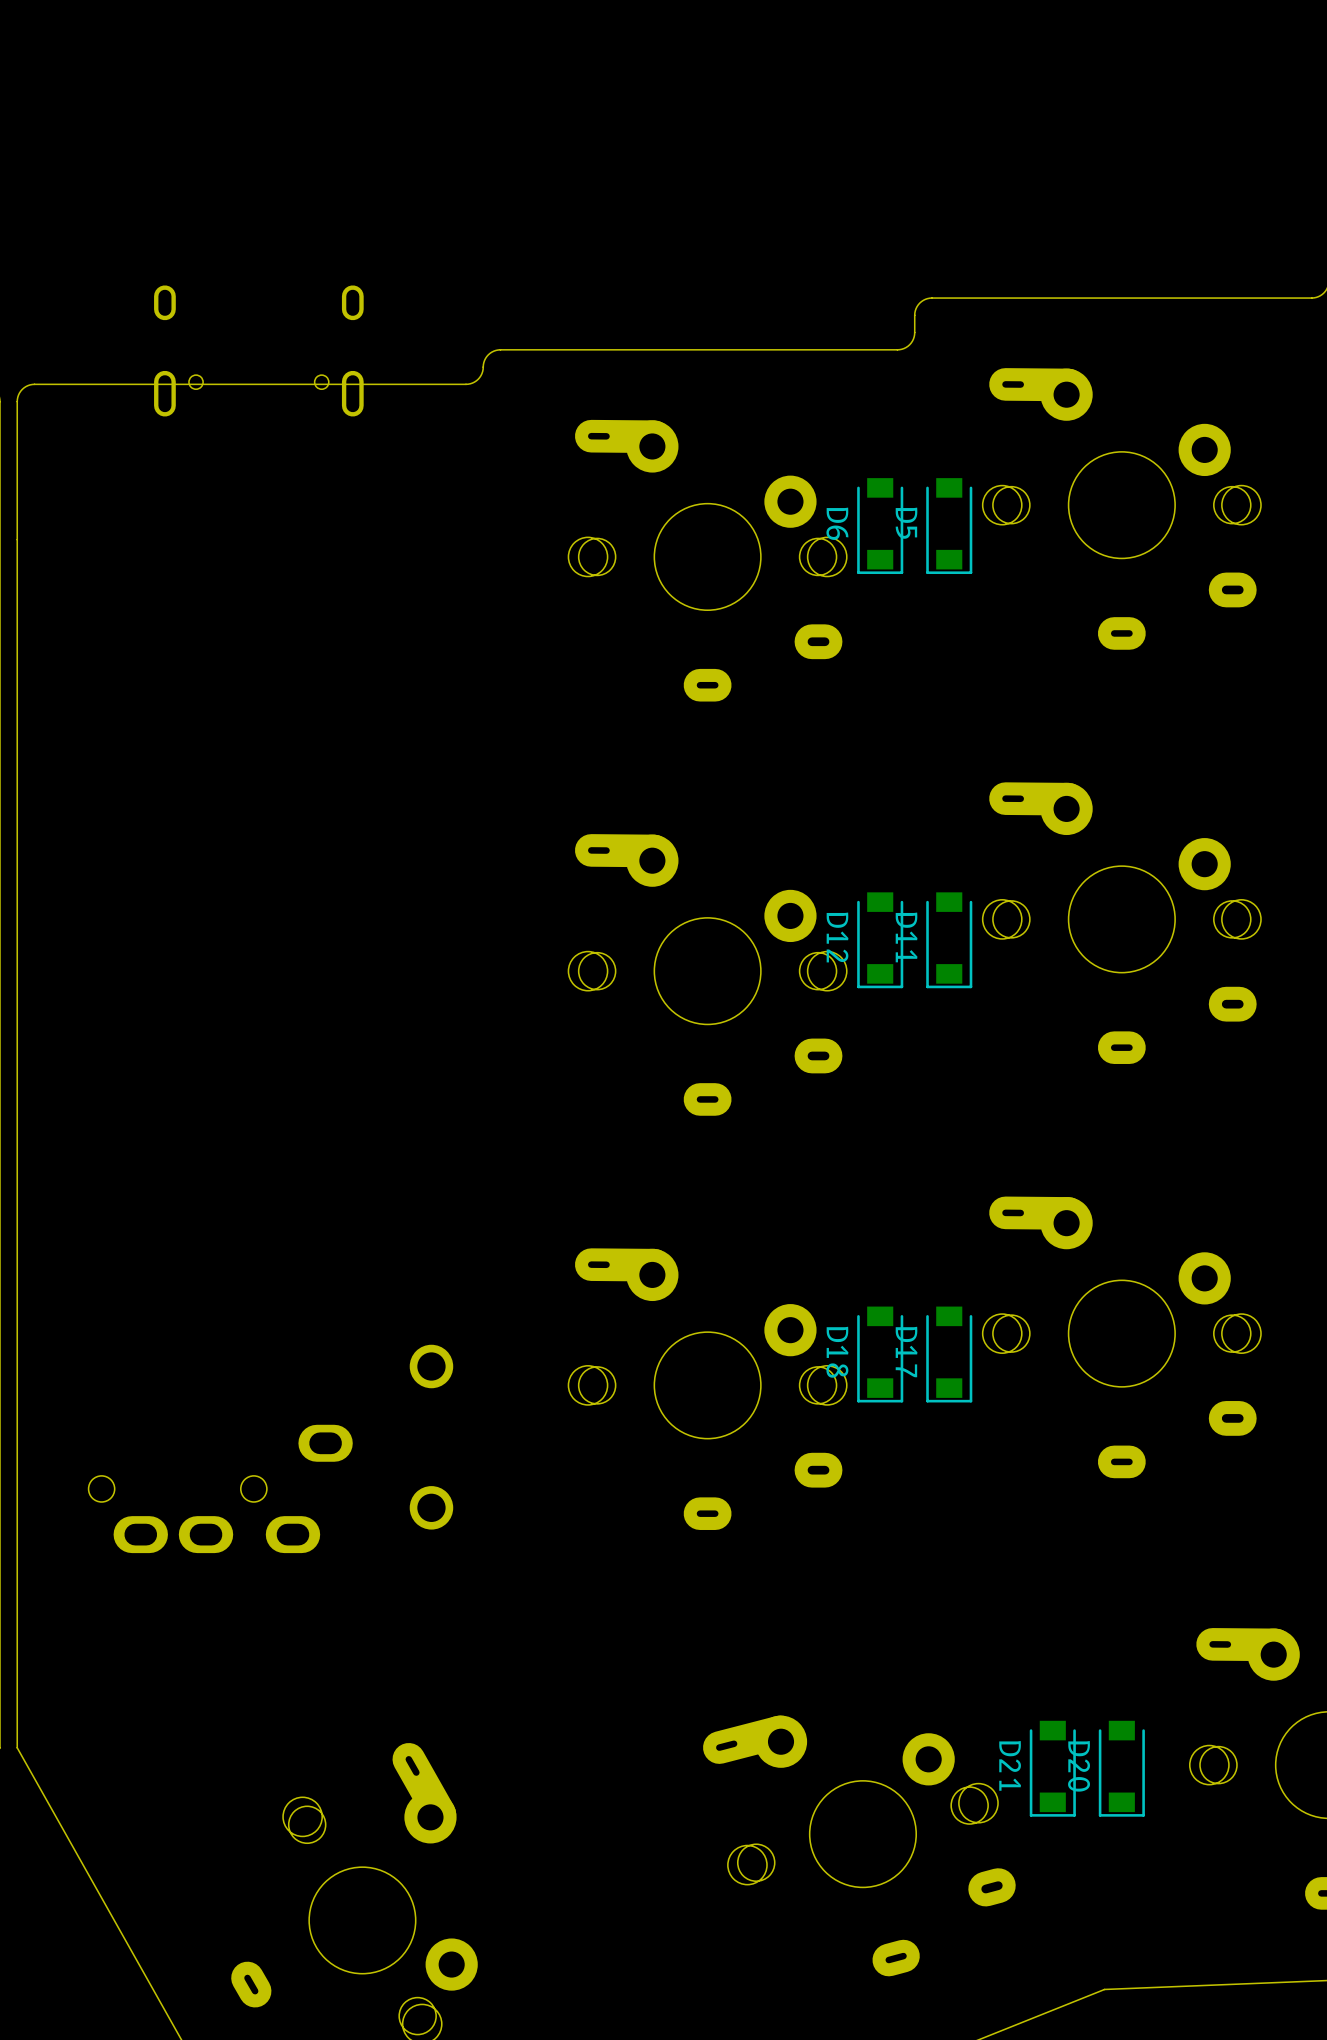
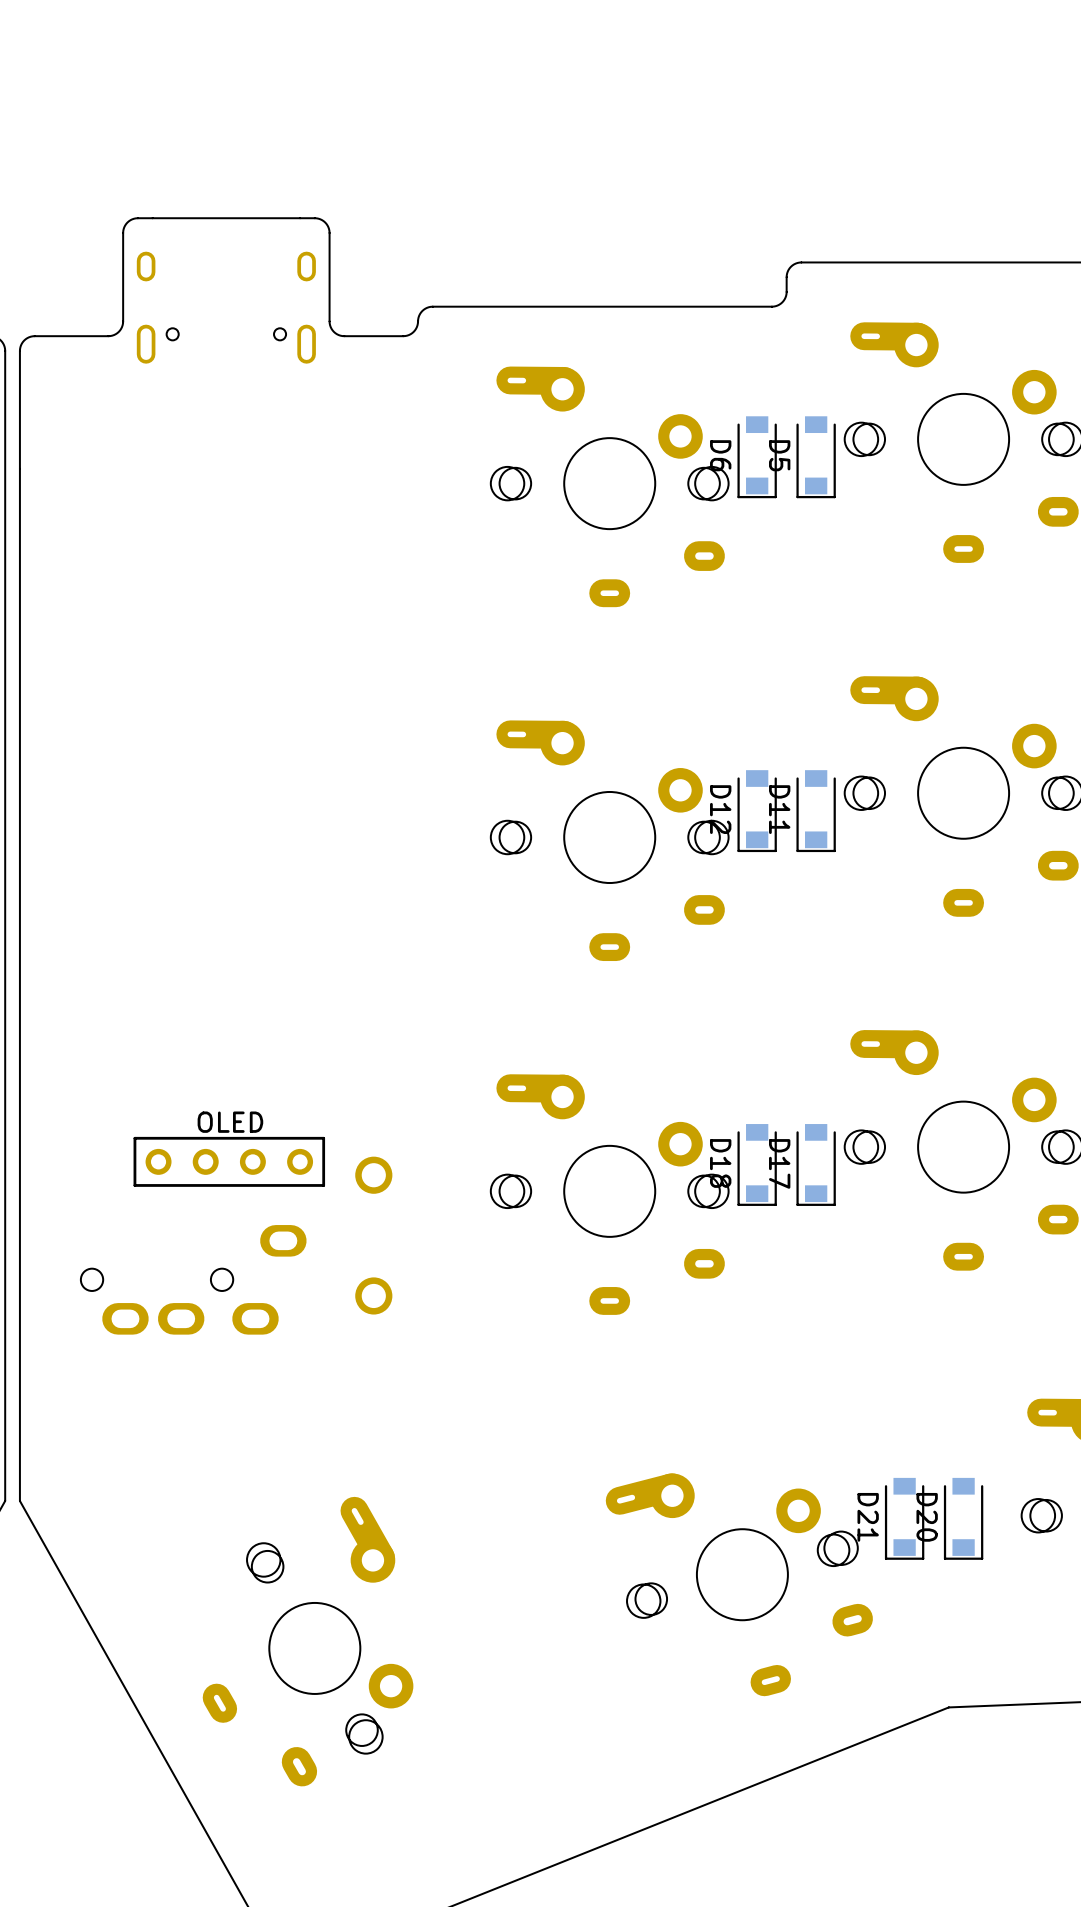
board edge: none -> (137, 218) (127, 222) (123, 231) (122, 325) (117, 333) (108, 336)
board edge: (396, 384) (120, 384) -> (344, 336) (335, 333) (329, 323) (329, 231) (322, 220) (314, 218) (137, 218)
part: none -> (229, 1161)

